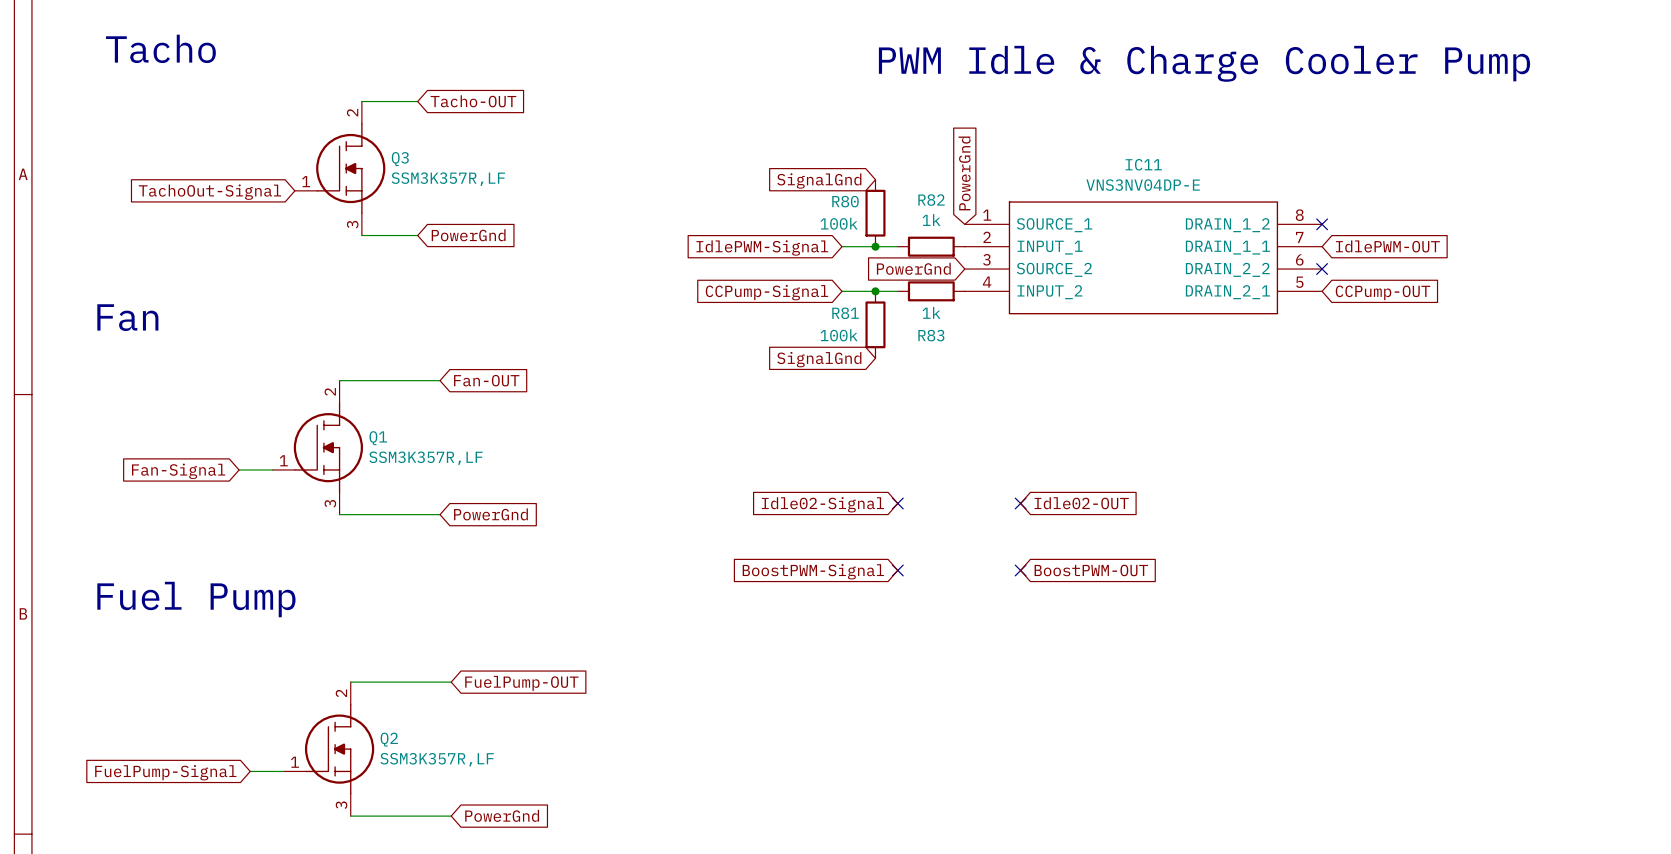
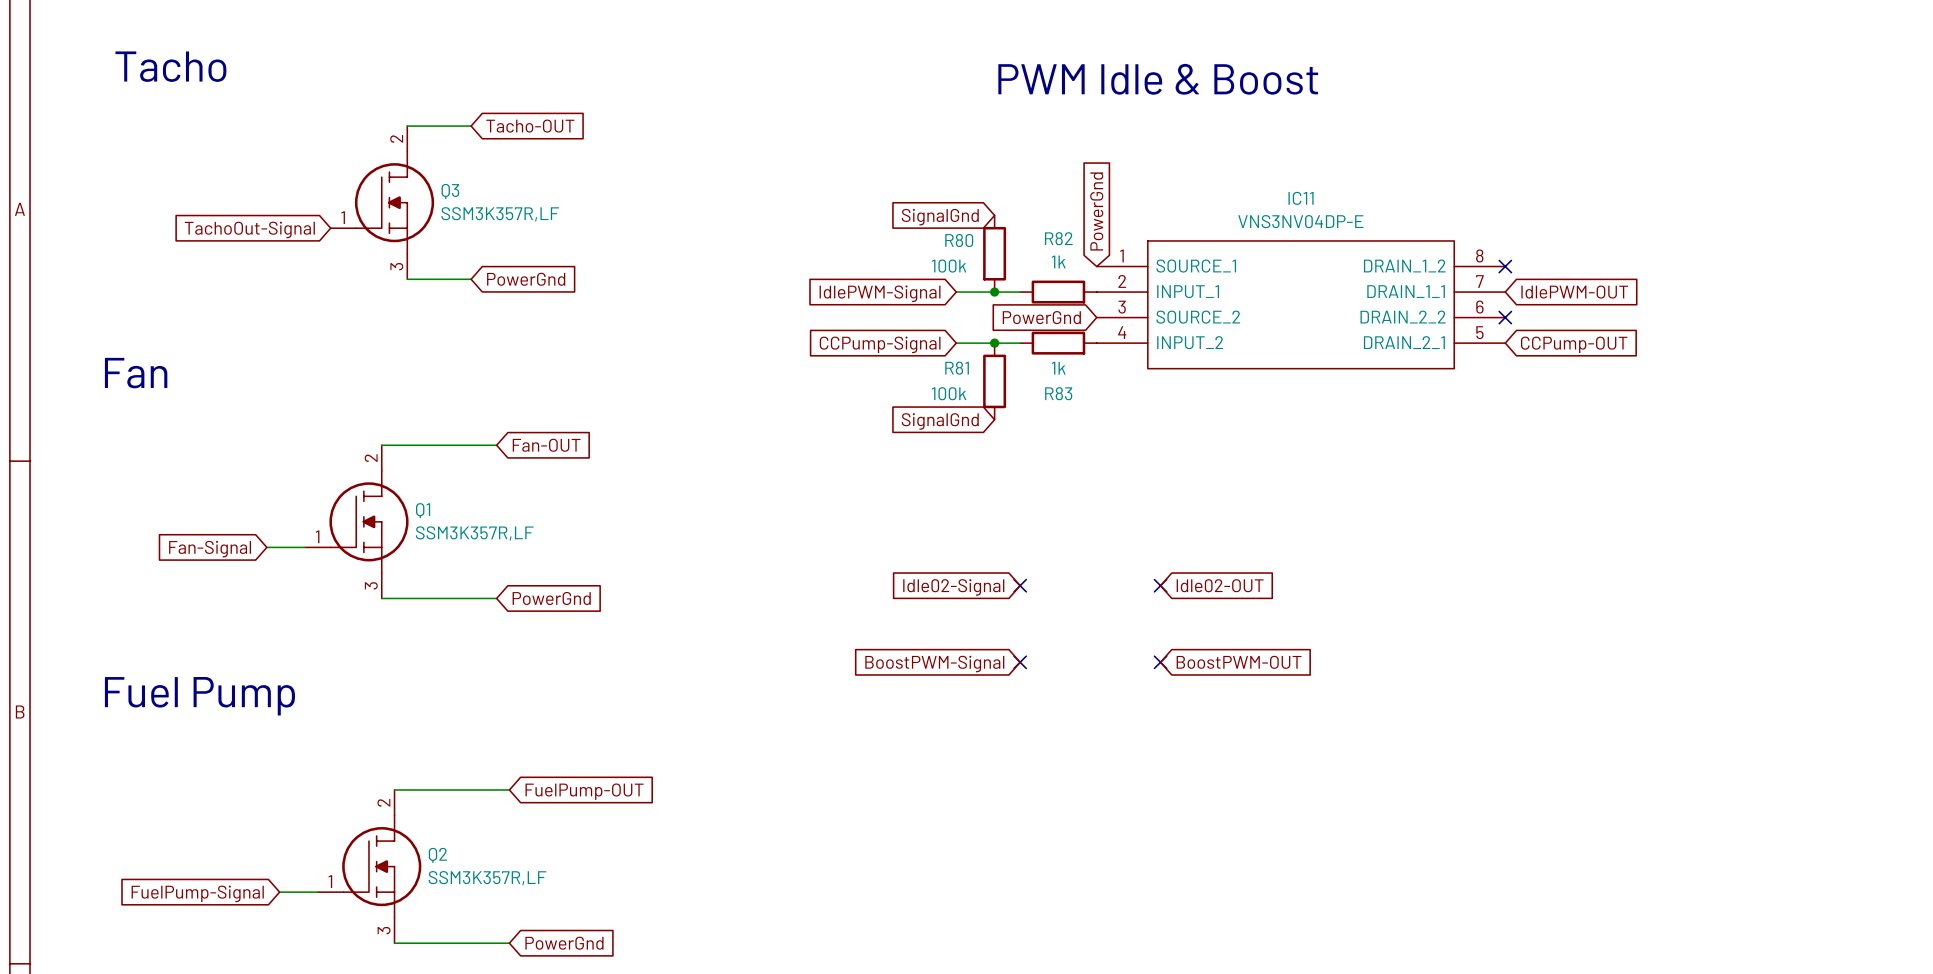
text: PWM Idle & Charge Cooler Pump (1204, 63) -> PWM Idle & Boost (1158, 79)

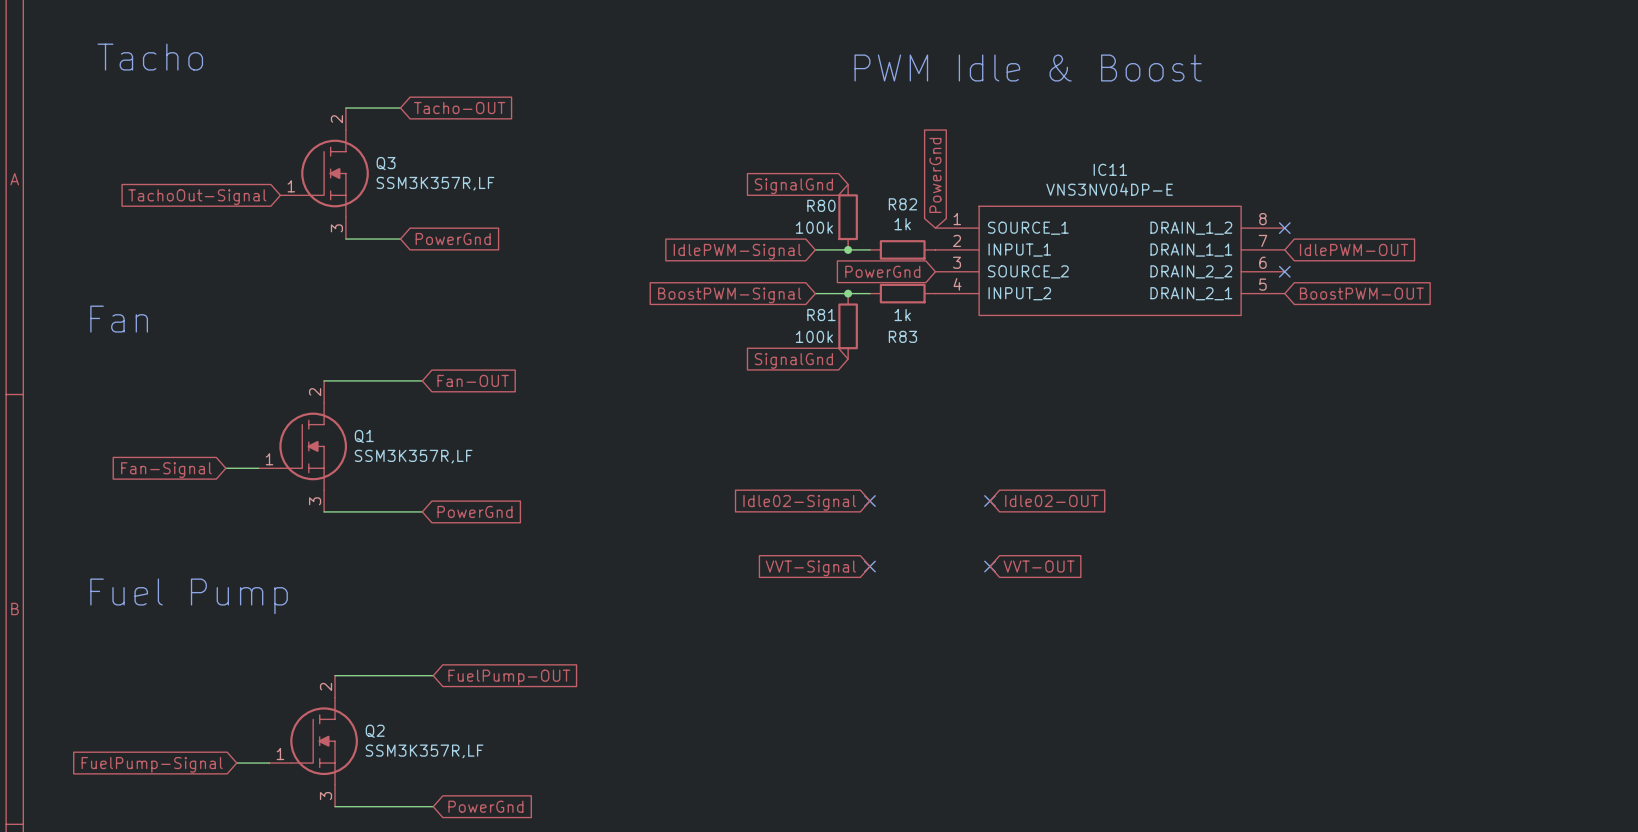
global label: CCPump-Signal (880, 344) -> BoostPWM-Signal (729, 295)
global label: CCPump-OUT (1574, 344) -> BoostPWM-OUT (1361, 293)
global label: BoostPWM-OUT (1239, 662) -> VVT-OUT (1039, 566)
global label: BoostPWM-Signal (934, 664) -> VVT-Signal (810, 568)

